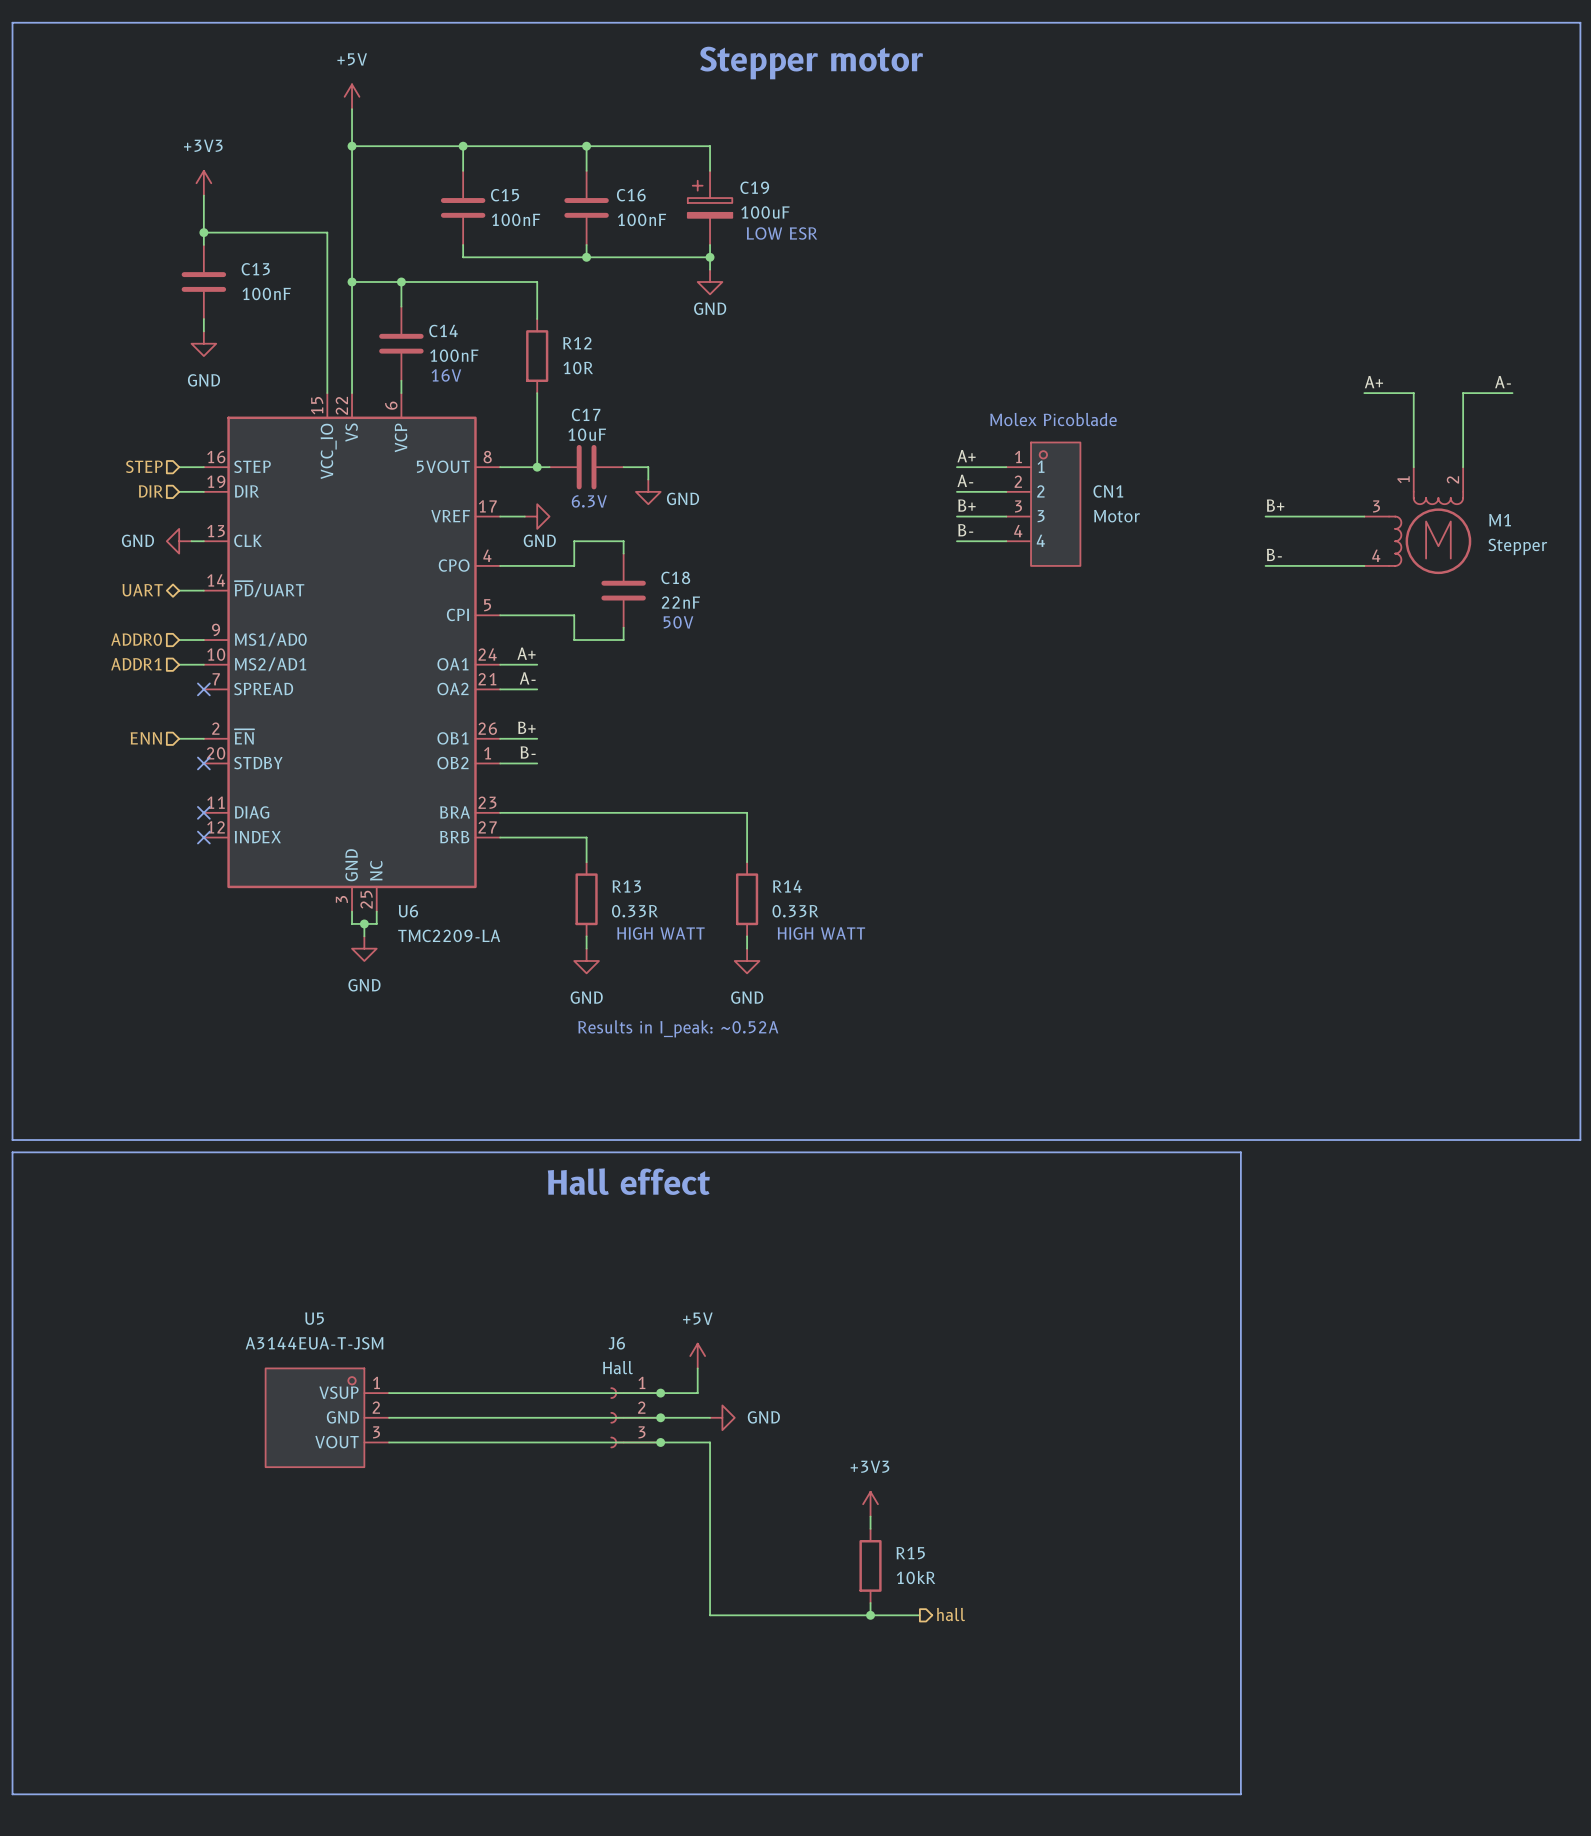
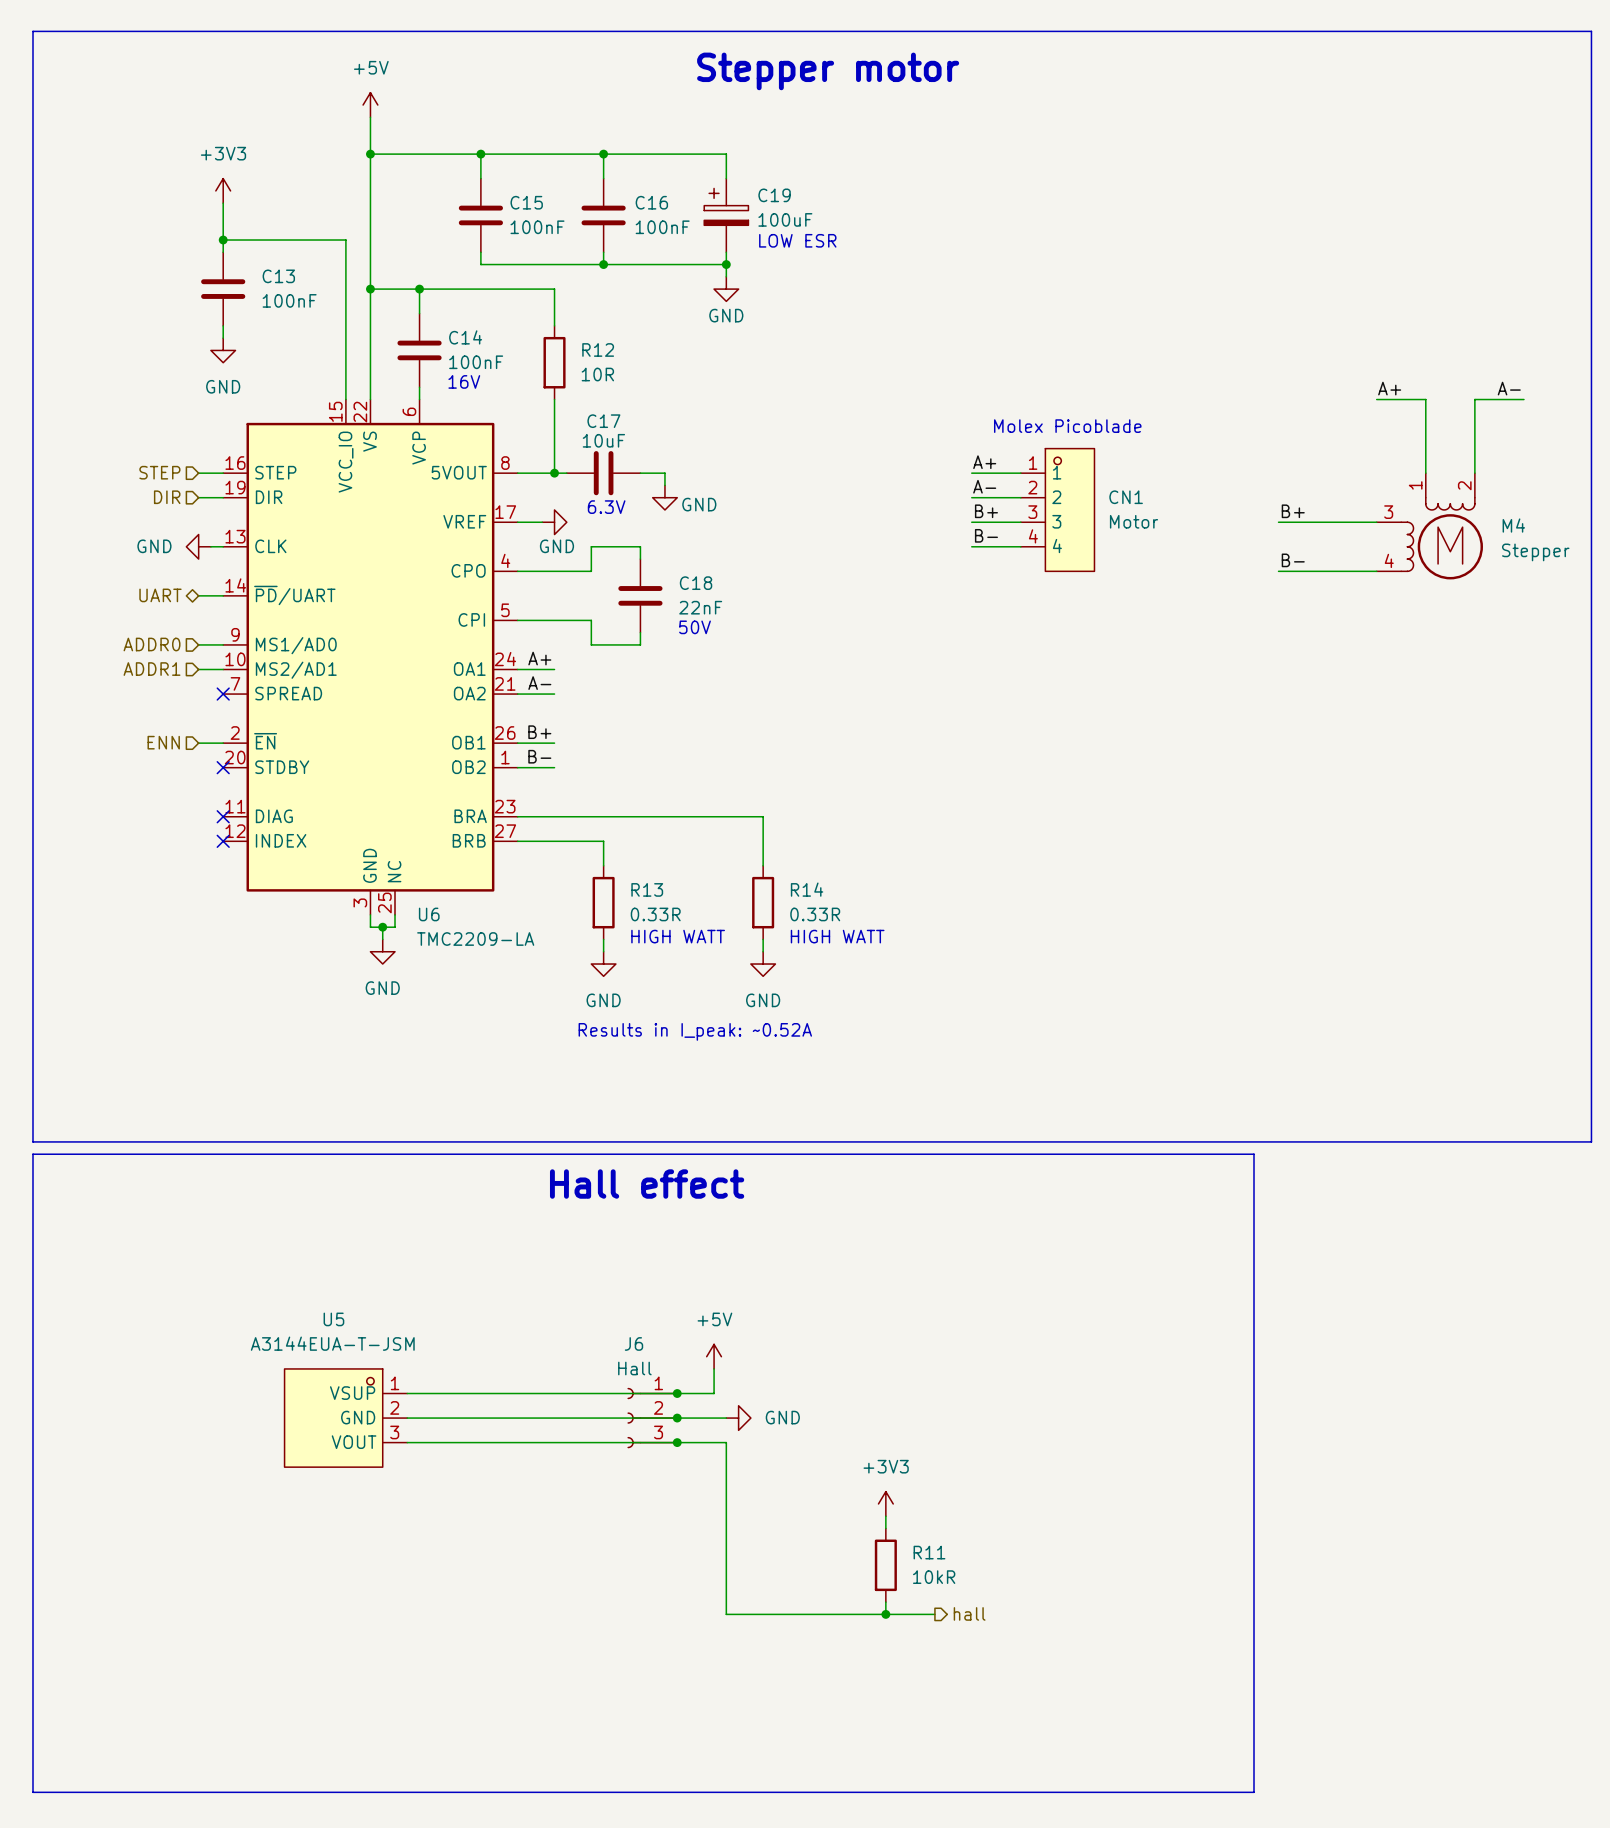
M1 name: M1 (1500, 520) -> M4 (1513, 525)
R15 name: R15 (910, 1553) -> R11 (929, 1552)

